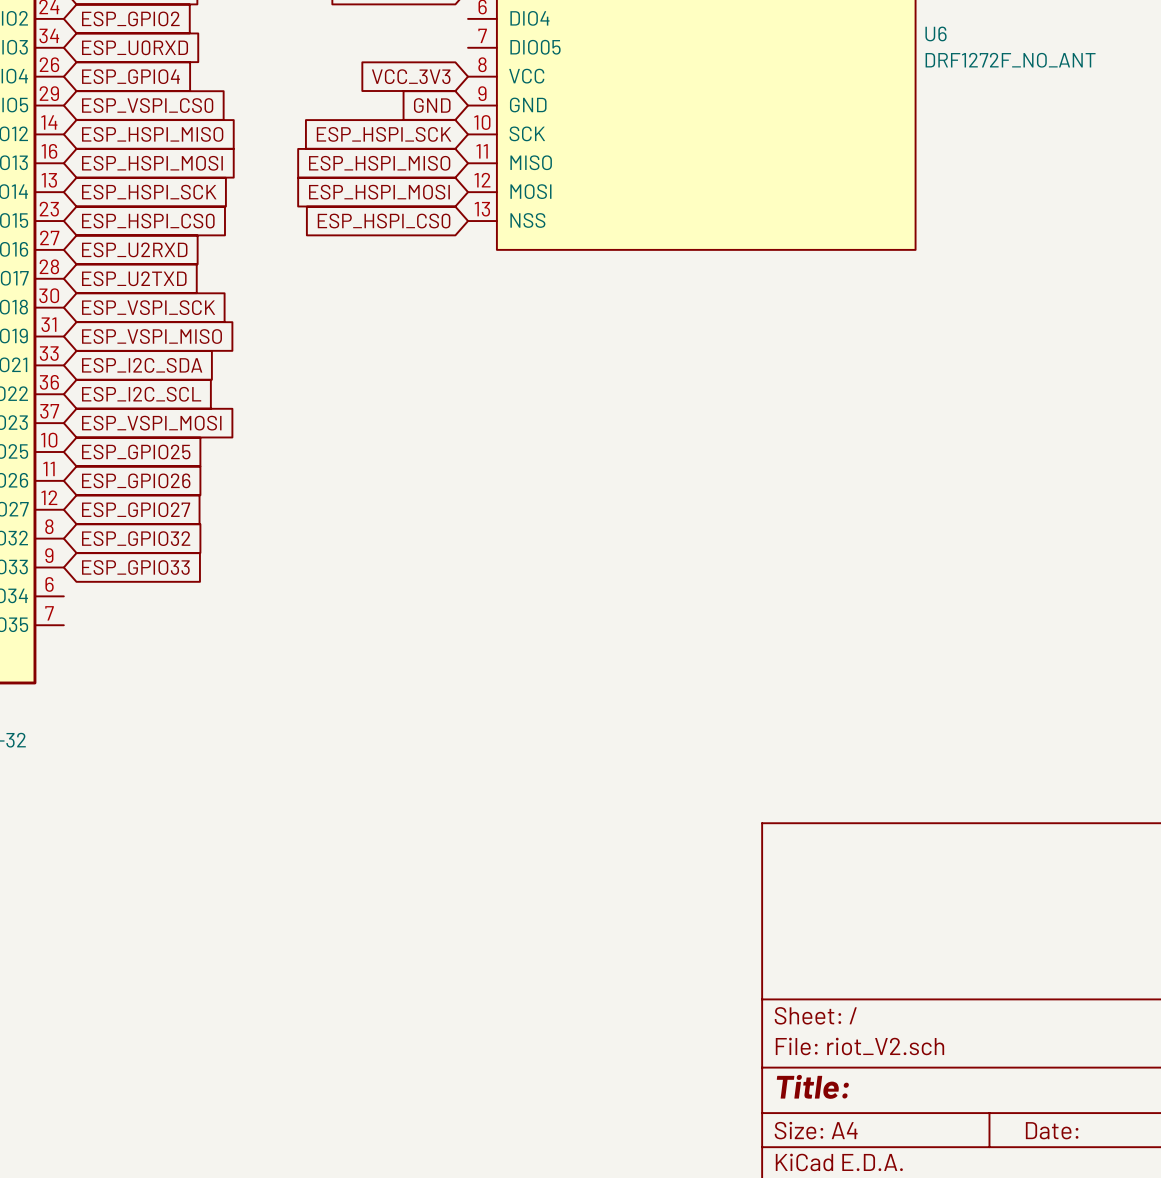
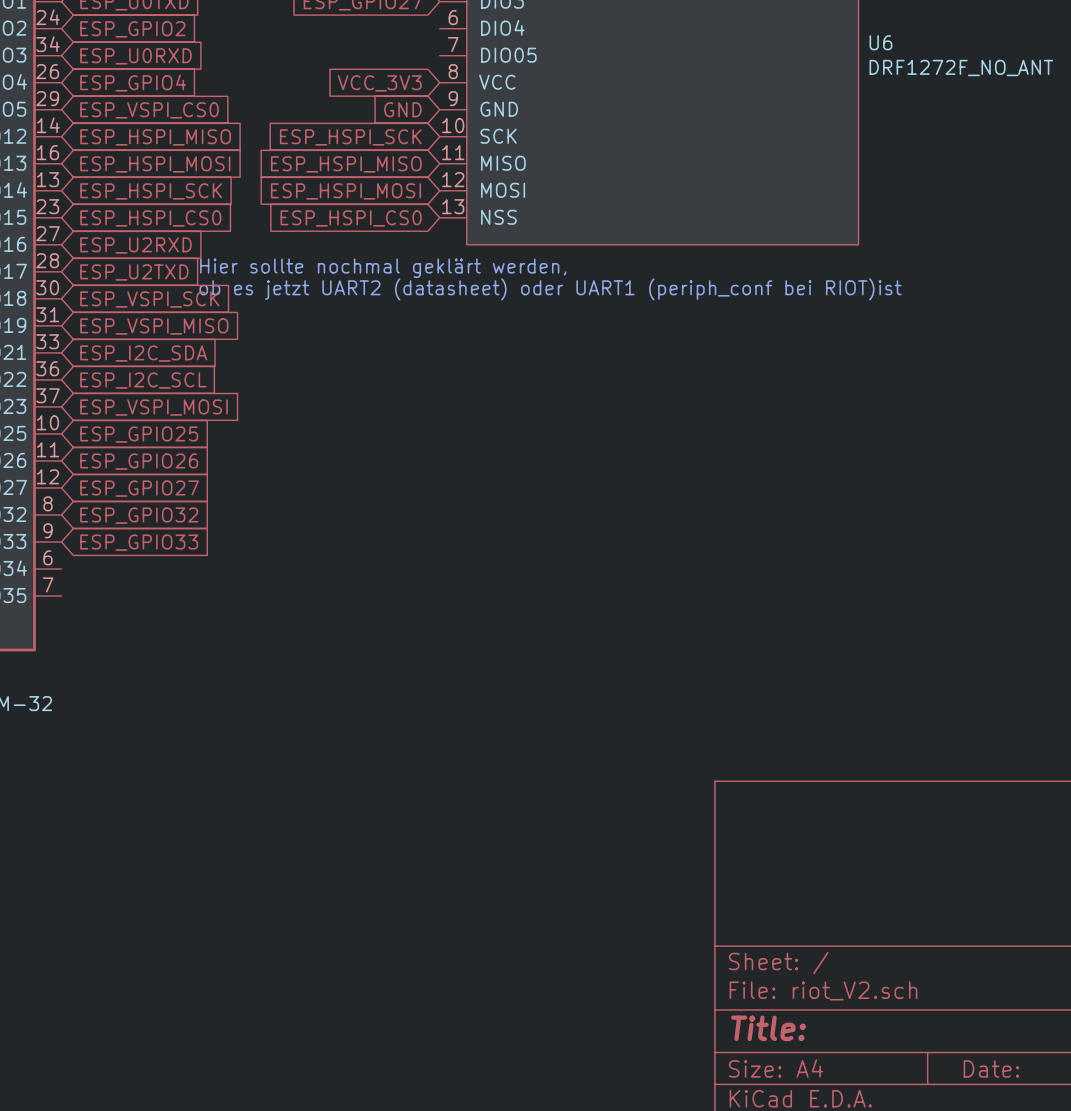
text: none -> Hier sollte nochmal geklärt werden, (383, 268)
text: none -> ob es jetzt UART2 (datasheet) oder UART1 (periph_conf bei RIOT)ist (550, 289)

